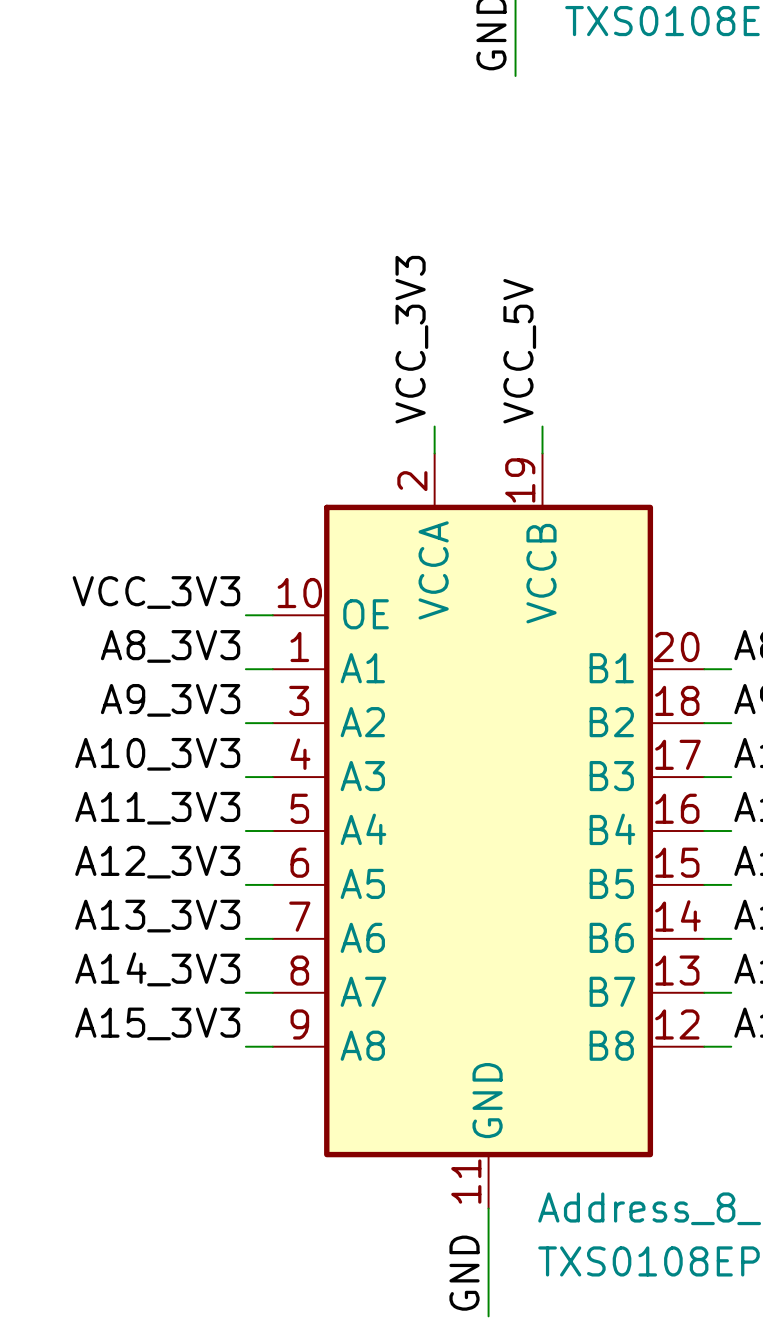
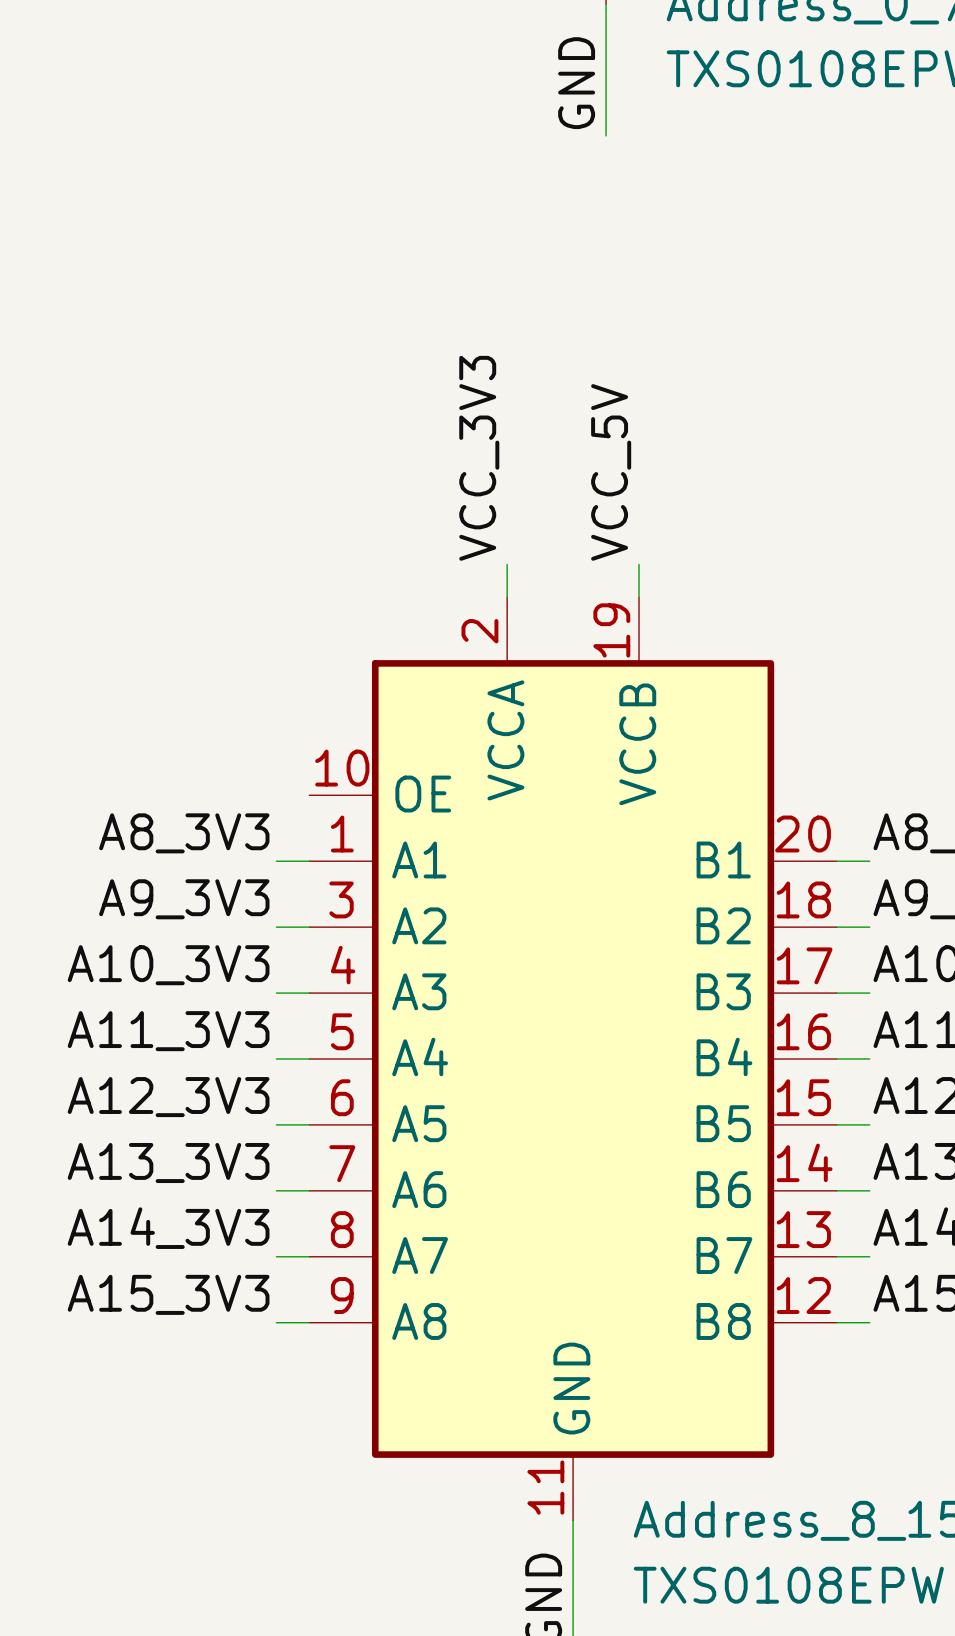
label: VCC_3V3 (156, 592) -> none
wire: (245, 615) (272, 615) -> none

